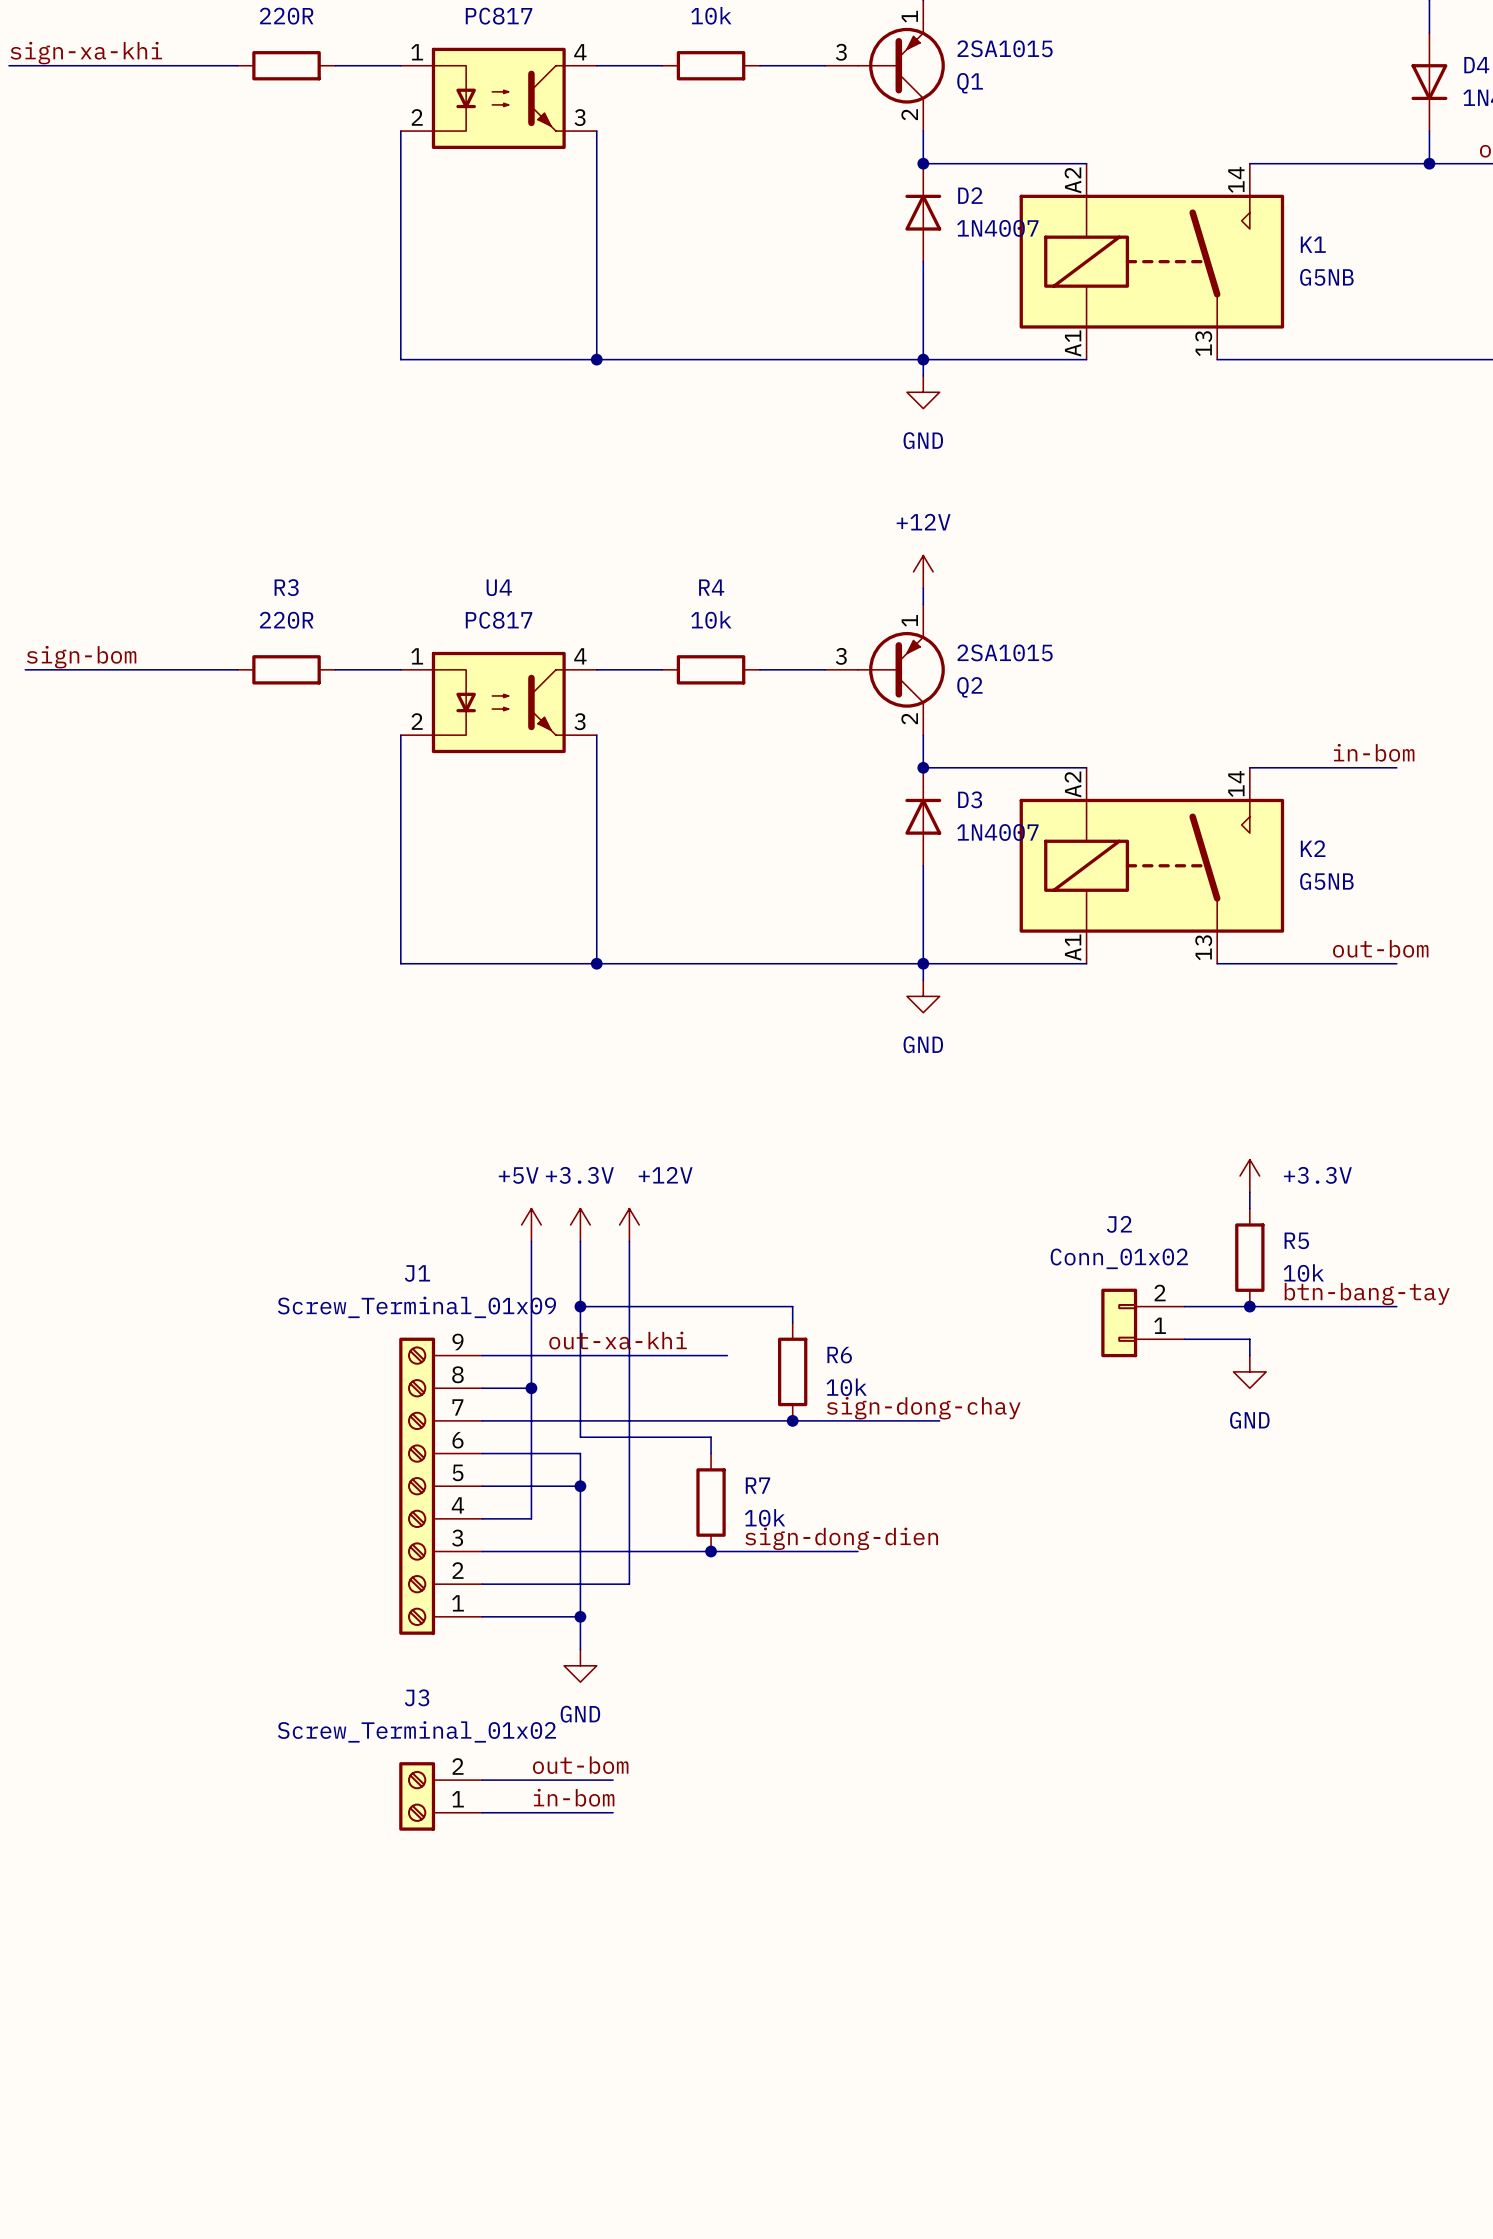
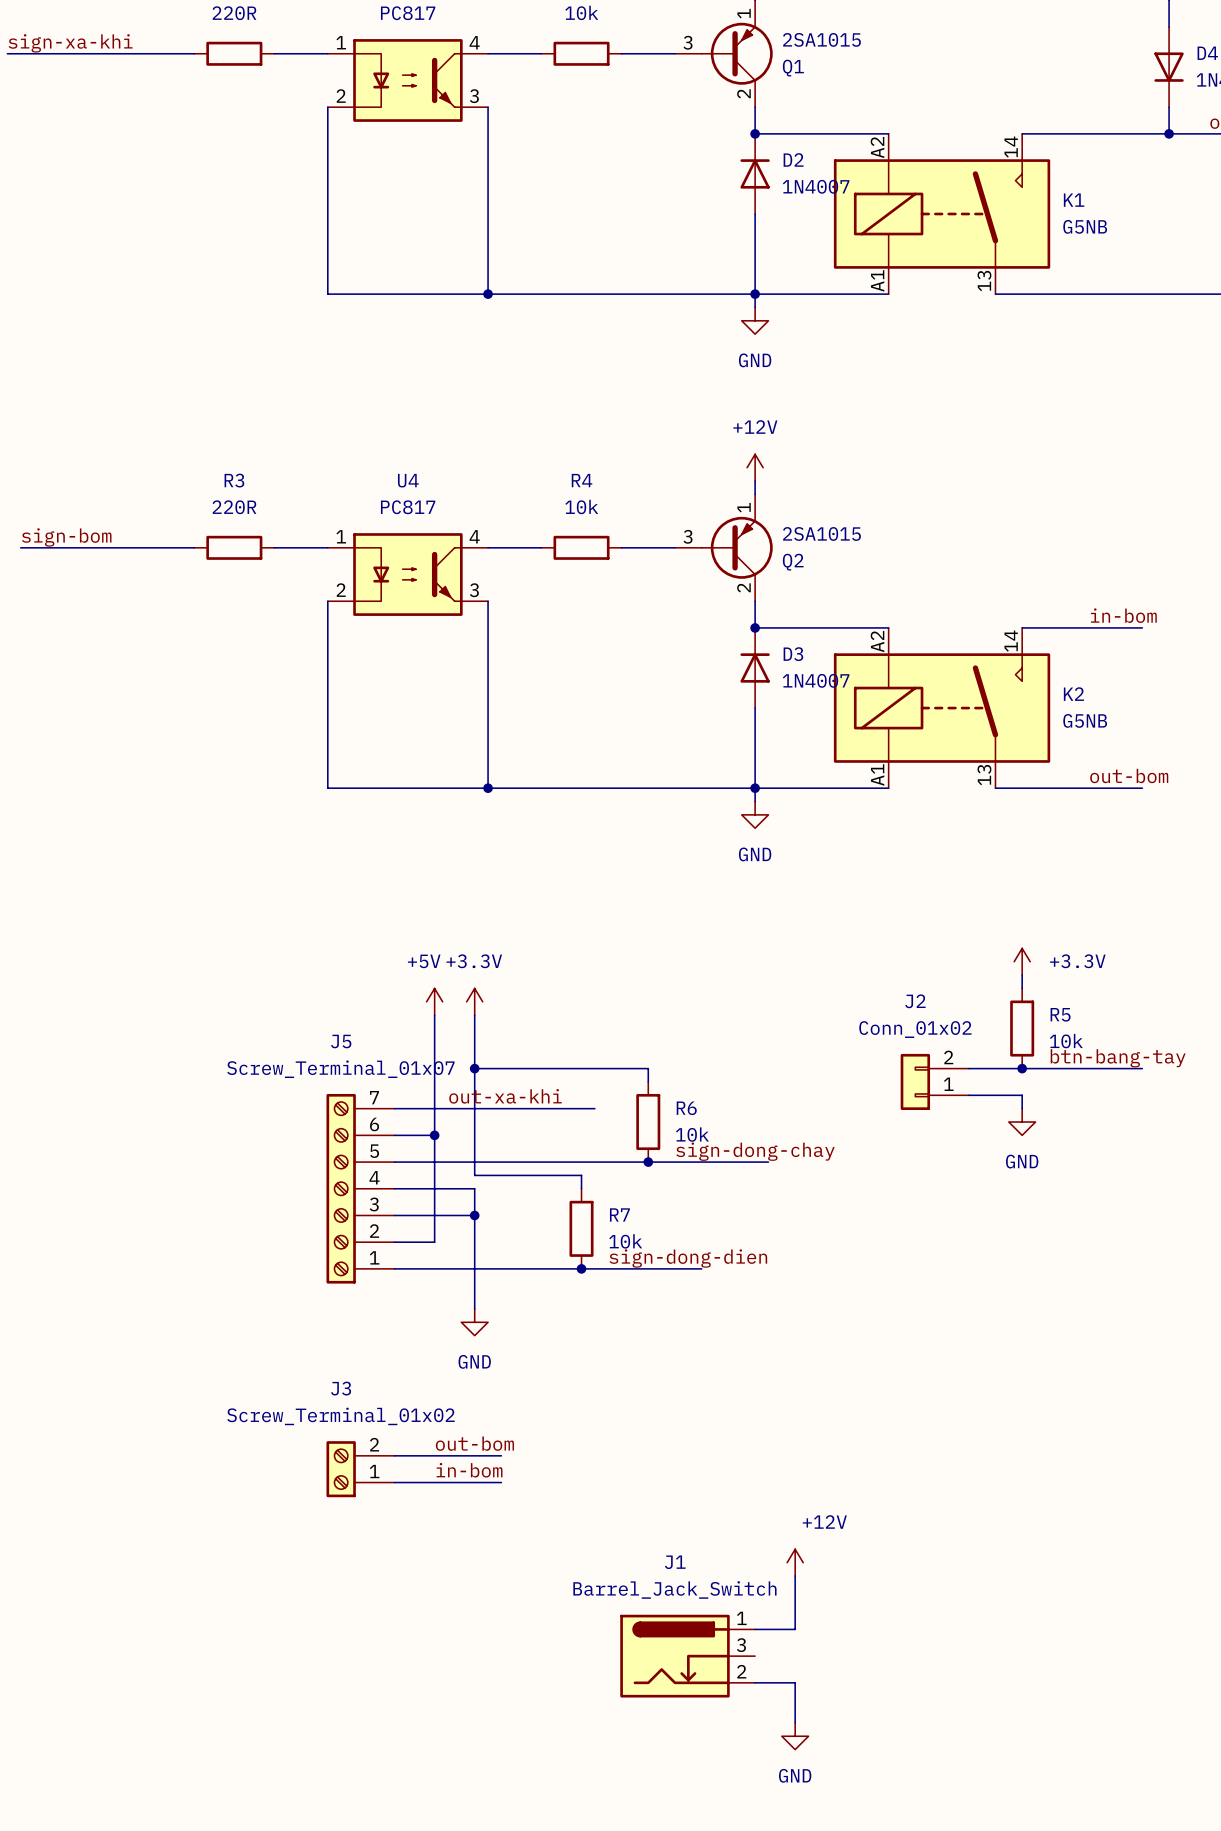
power symbol: +12V (629, 1224) -> none
wire: (629, 1241) (629, 1584) (482, 1584) -> none
J1 name position: J1 (417, 1273) -> J1 (675, 1562)
J1 value: Screw_Terminal_01x09 (416, 1307) -> Barrel_Jack_Switch (674, 1590)
J1 symbol: [399, 1337, 483, 1635] -> [620, 1614, 756, 1698]
J5: none -> Screw_Terminal_01x07 (360, 1188)
wire: (580, 1600) (580, 1649) -> none
wire: (482, 1616) (580, 1616) -> none
junction: (580, 1616) -> none
power symbol position: GND (580, 1665) -> GND (474, 1322)
power symbol: none -> +12V (795, 1562)
wire: none -> (795, 1576) (795, 1629) (755, 1629)
wire: none -> (755, 1682) (795, 1682) (795, 1722)
power symbol: none -> GND (795, 1736)

